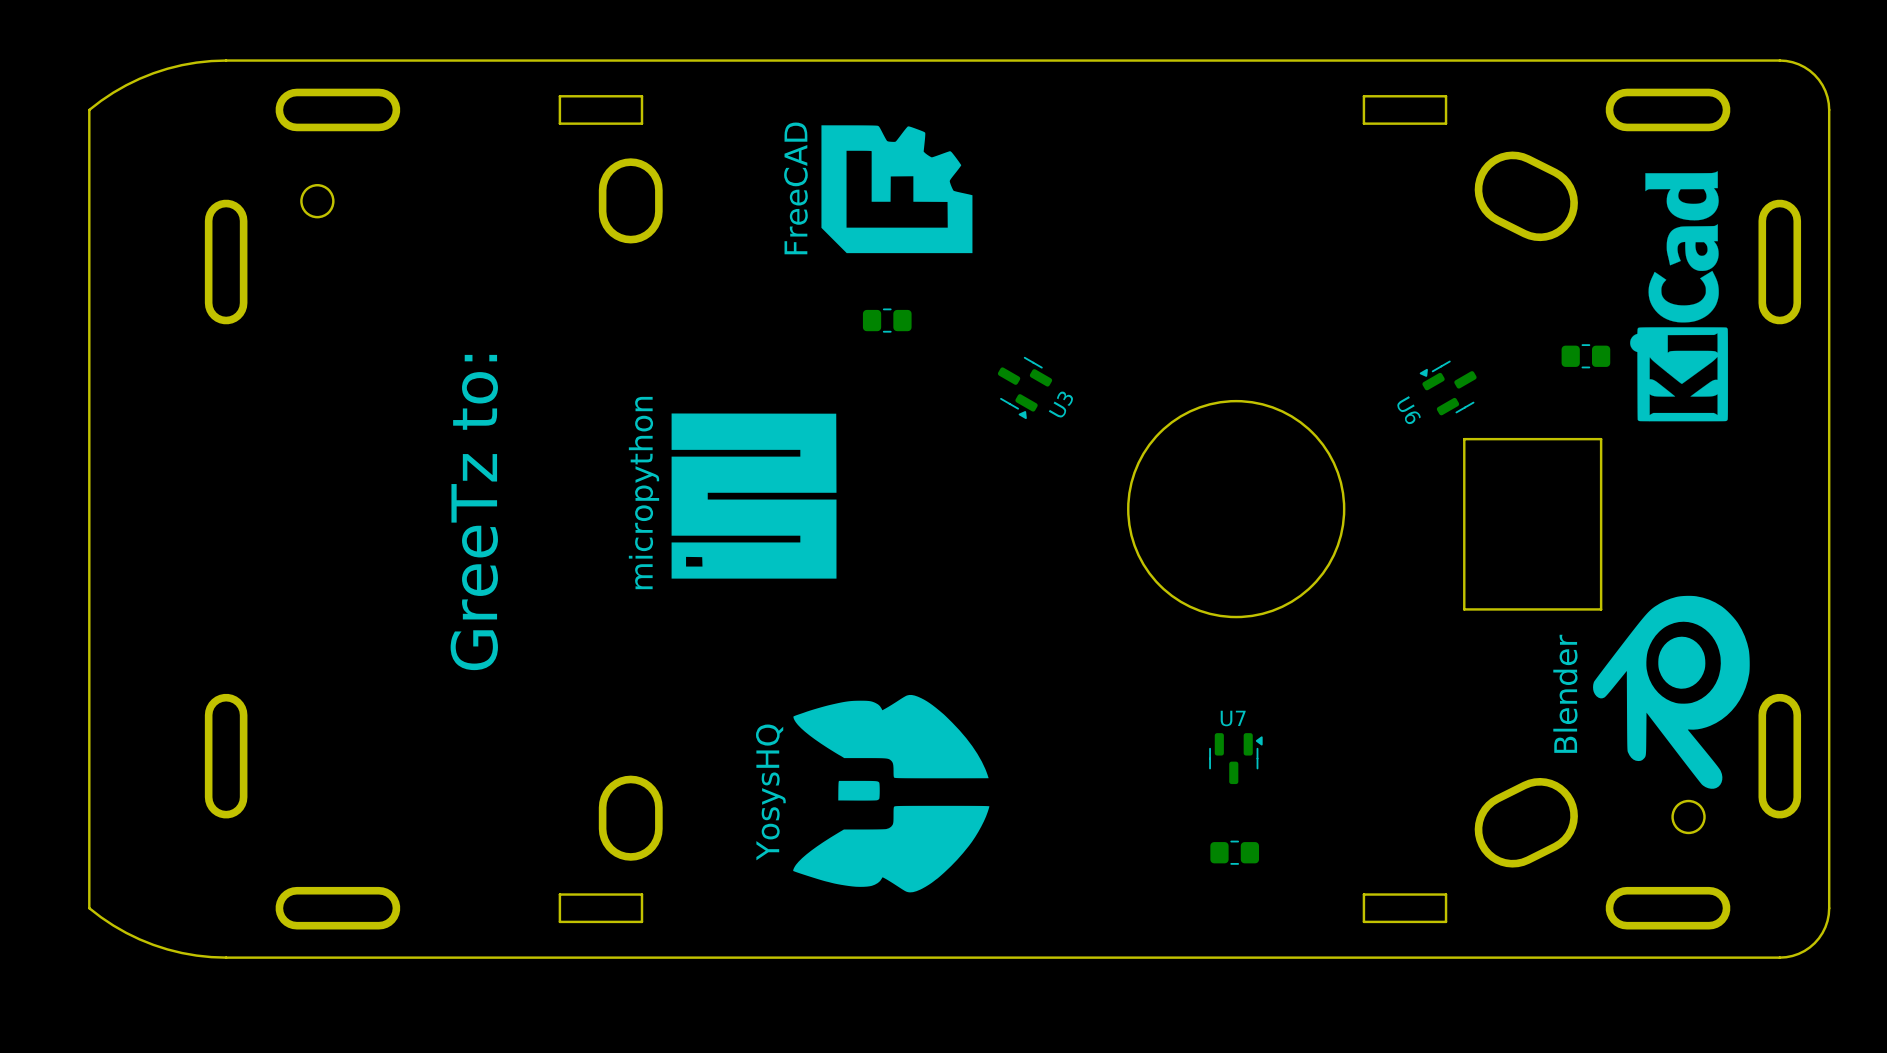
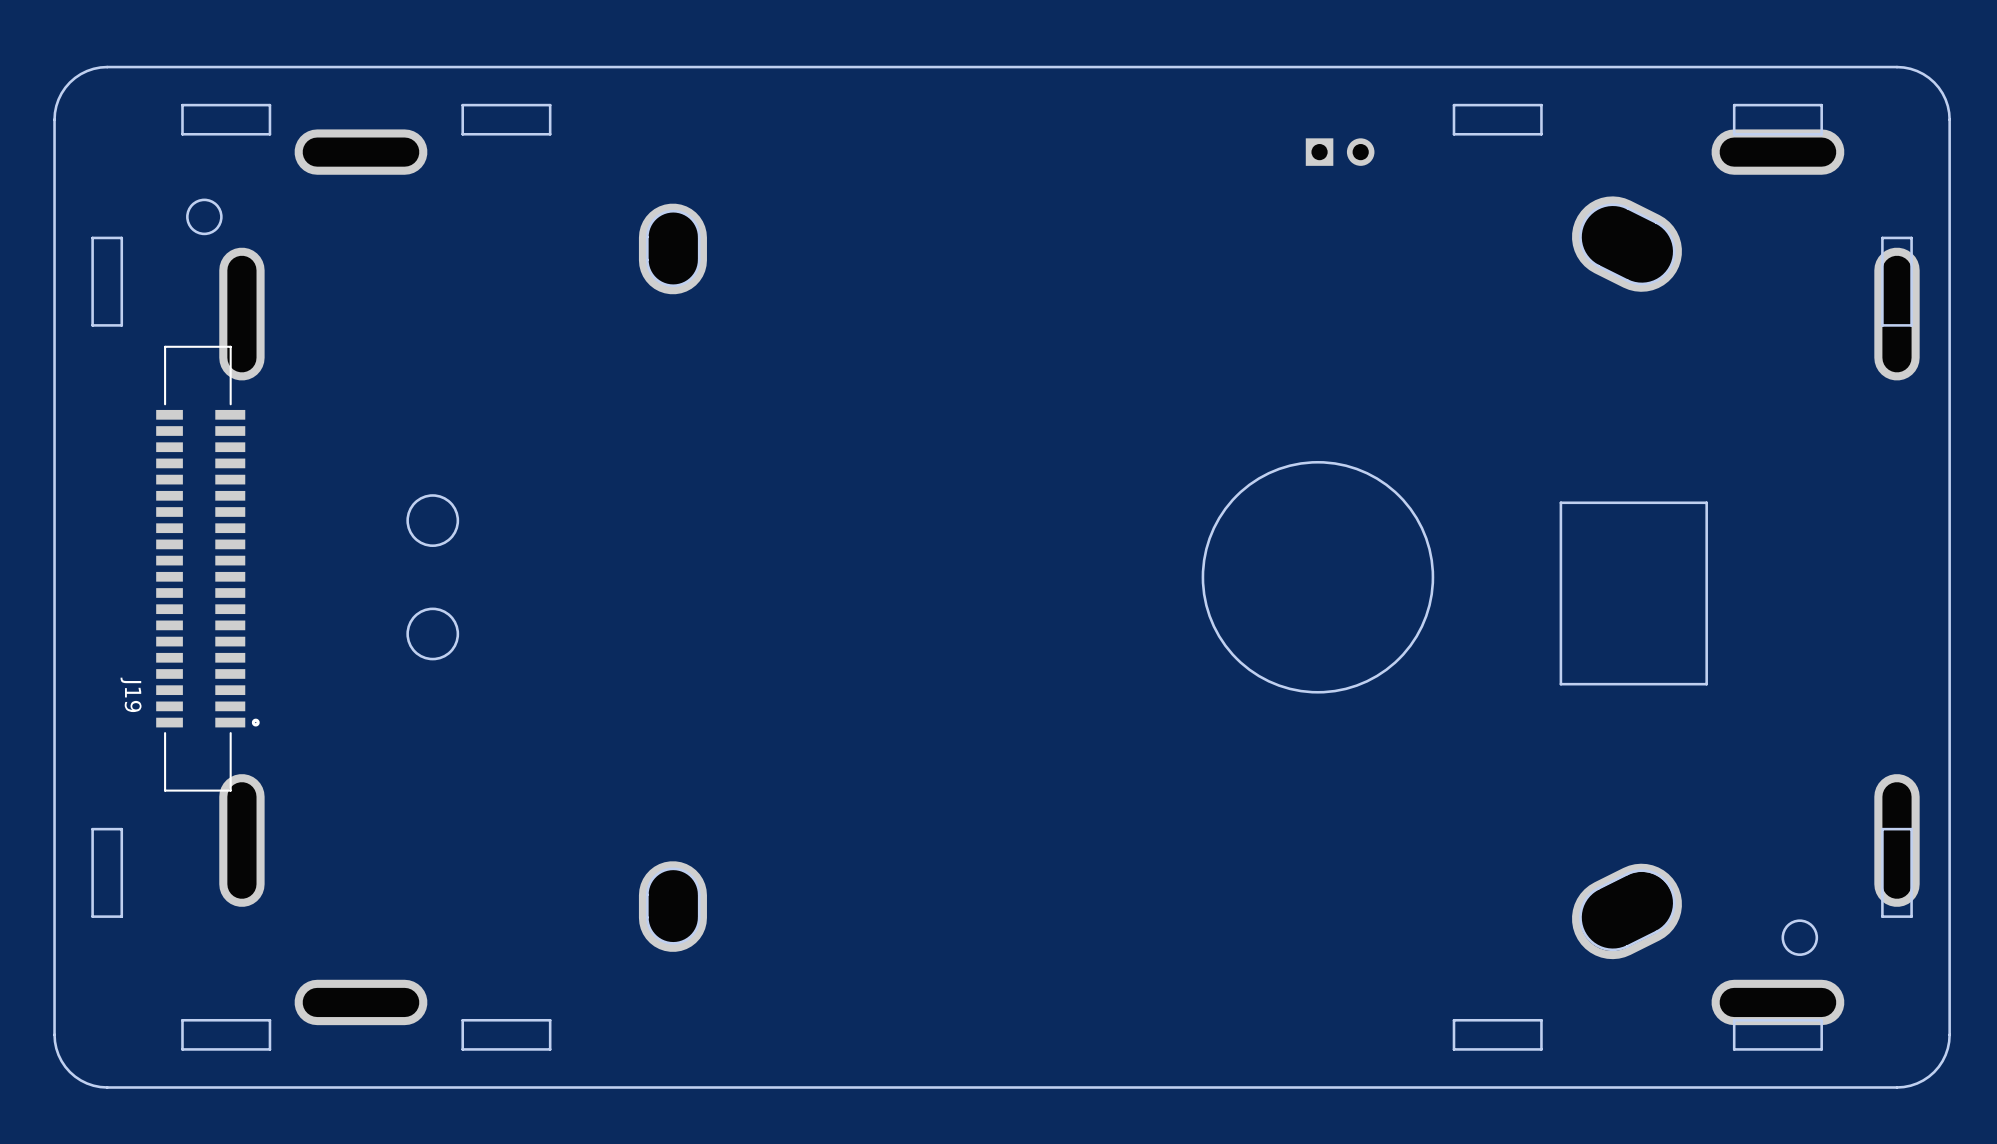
board edge: none -> (269, 105) (182, 105) (182, 134) (269, 134) (269, 105)
board edge: none -> (1821, 105) (1734, 105) (1734, 134) (1821, 134) (1821, 105)
board edge: (642, 96) (642, 123) (559, 123) (559, 96) (642, 96) -> (550, 105) (550, 134) (462, 134) (462, 105) (550, 105)
board edge: (1446, 96) (1446, 123) (1363, 123) (1363, 96) (1446, 96) -> (1541, 105) (1541, 134) (1453, 134) (1453, 105) (1541, 105)
part: none -> (1340, 152)
board edge: (1829, 109) (1825, 91) (1814, 75) (1798, 64) (1779, 60) (226, 60) (181, 65) (153, 73) (126, 85) (89, 109) (89, 908) (113, 925) (139, 939) (181, 953) (226, 957) (1779, 957) (1798, 953) (1814, 943) (1825, 927) (1829, 908) -> (1949, 152) (1949, 112) (1942, 93) (1934, 82) (1923, 74) (1910, 68) (1896, 67) (107, 67) (87, 71) (69, 82) (58, 99) (54, 119) (54, 1034) (58, 1055) (65, 1066) (75, 1076) (87, 1083) (107, 1087) (1896, 1087) (1910, 1085) (1923, 1080) (1934, 1072) (1942, 1061) (1949, 1041) (1949, 1002)
drawing: [821, 125, 973, 254] -> none
board edge: none -> (1627, 208) (1659, 224) (1671, 239) (1674, 250) (1672, 262) (1663, 275) (1654, 281) (1642, 283) (1627, 280) (1595, 264) (1582, 249) (1581, 230) (1590, 213) (1608, 205) (1627, 208)
drawing: [1630, 171, 1729, 422] -> none
text: FreeCAD (795, 188) -> none
board edge: none -> (699, 237) (698, 266) (690, 279) (682, 284) (673, 285) (661, 282) (653, 276) (647, 262) (647, 237) (649, 227) (656, 217) (670, 211) (685, 214) (694, 222) (699, 237)
board edge: none -> (121, 237) (92, 237) (92, 325) (121, 325) (121, 237)
board edge: none -> (1911, 237) (1882, 237) (1882, 325) (1911, 325) (1911, 237)
round board edge position: (317, 201) -> (204, 216)
part: (887, 320) -> none
part: (1585, 356) -> none
U3: (1025, 387) -> none
U6: (1448, 387) -> none
drawing: [671, 413, 837, 579] -> none
round board edge: none -> [406, 494, 460, 547]
text: micropython (643, 493) -> none
J19: none -> (207, 568)
text: GreeTz to: (474, 512) -> none
round board edge: none -> [406, 607, 460, 661]
drawing: [1593, 595, 1750, 789] -> none
text: Blender (1565, 693) -> none
drawing: [793, 694, 990, 893] -> none
board edge: none -> (121, 829) (92, 829) (92, 916) (121, 916) (121, 829)
board edge: none -> (1911, 829) (1882, 829) (1882, 916) (1911, 916) (1911, 829)
U7: (1235, 758) -> none
board edge: none -> (1627, 874) (1595, 890) (1582, 905) (1580, 920) (1583, 931) (1590, 941) (1600, 947) (1612, 949) (1627, 946) (1659, 930) (1671, 915) (1673, 895) (1663, 879) (1646, 870) (1627, 874)
text: YosysHQ (770, 792) -> none
board edge: none -> (699, 894) (698, 923) (690, 936) (679, 942) (670, 943) (661, 940) (653, 934) (647, 920) (647, 894) (649, 885) (656, 875) (670, 869) (685, 871) (694, 880) (699, 894)
round board edge position: (1688, 816) -> (1799, 937)
part: (1234, 852) -> none
board edge: (642, 894) (642, 921) (559, 921) (559, 894) (642, 894) -> (550, 1020) (550, 1049) (462, 1049) (462, 1020) (550, 1020)
board edge: (1446, 894) (1446, 921) (1363, 921) (1363, 894) (1446, 894) -> (1541, 1020) (1541, 1049) (1453, 1049) (1453, 1020) (1541, 1020)
board edge: none -> (269, 1020) (182, 1020) (182, 1049) (269, 1049) (269, 1020)
board edge: none -> (1821, 1020) (1734, 1020) (1734, 1049) (1821, 1049) (1821, 1020)

